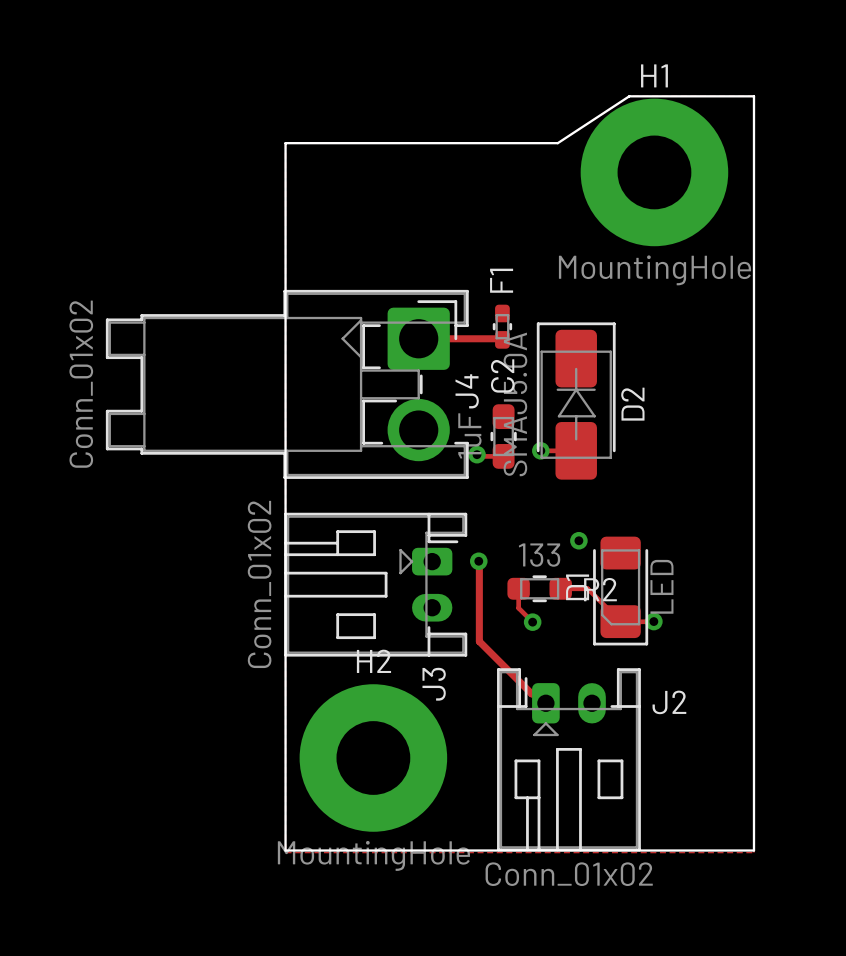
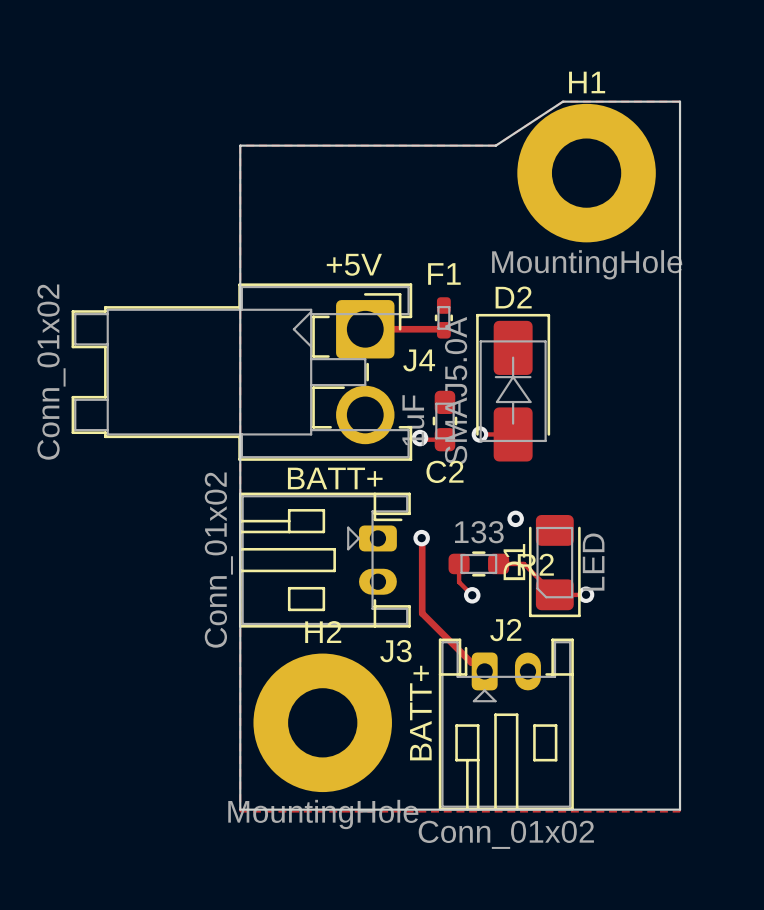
text: none -> +5V (354, 264)
F1 name rotation: 0° (501, 280) -> 90° clockwise (444, 273)
C2 name rotation: 0° (502, 375) -> 90° clockwise (444, 471)
C2 name position: C2 (502, 375) -> C2 (444, 471)
J4 name rotation: 0° (467, 391) -> 90° clockwise (419, 360)
D2 name rotation: 0° (632, 404) -> 90° clockwise (513, 297)
D2 name position: D2 (632, 404) -> D2 (513, 297)
text: none -> BATT+ (335, 478)
J3 name rotation: 0° (434, 684) -> 90° clockwise (395, 651)
J2 name position: J2 (669, 702) -> J2 (505, 630)
text: none -> BATT+ (420, 713)

